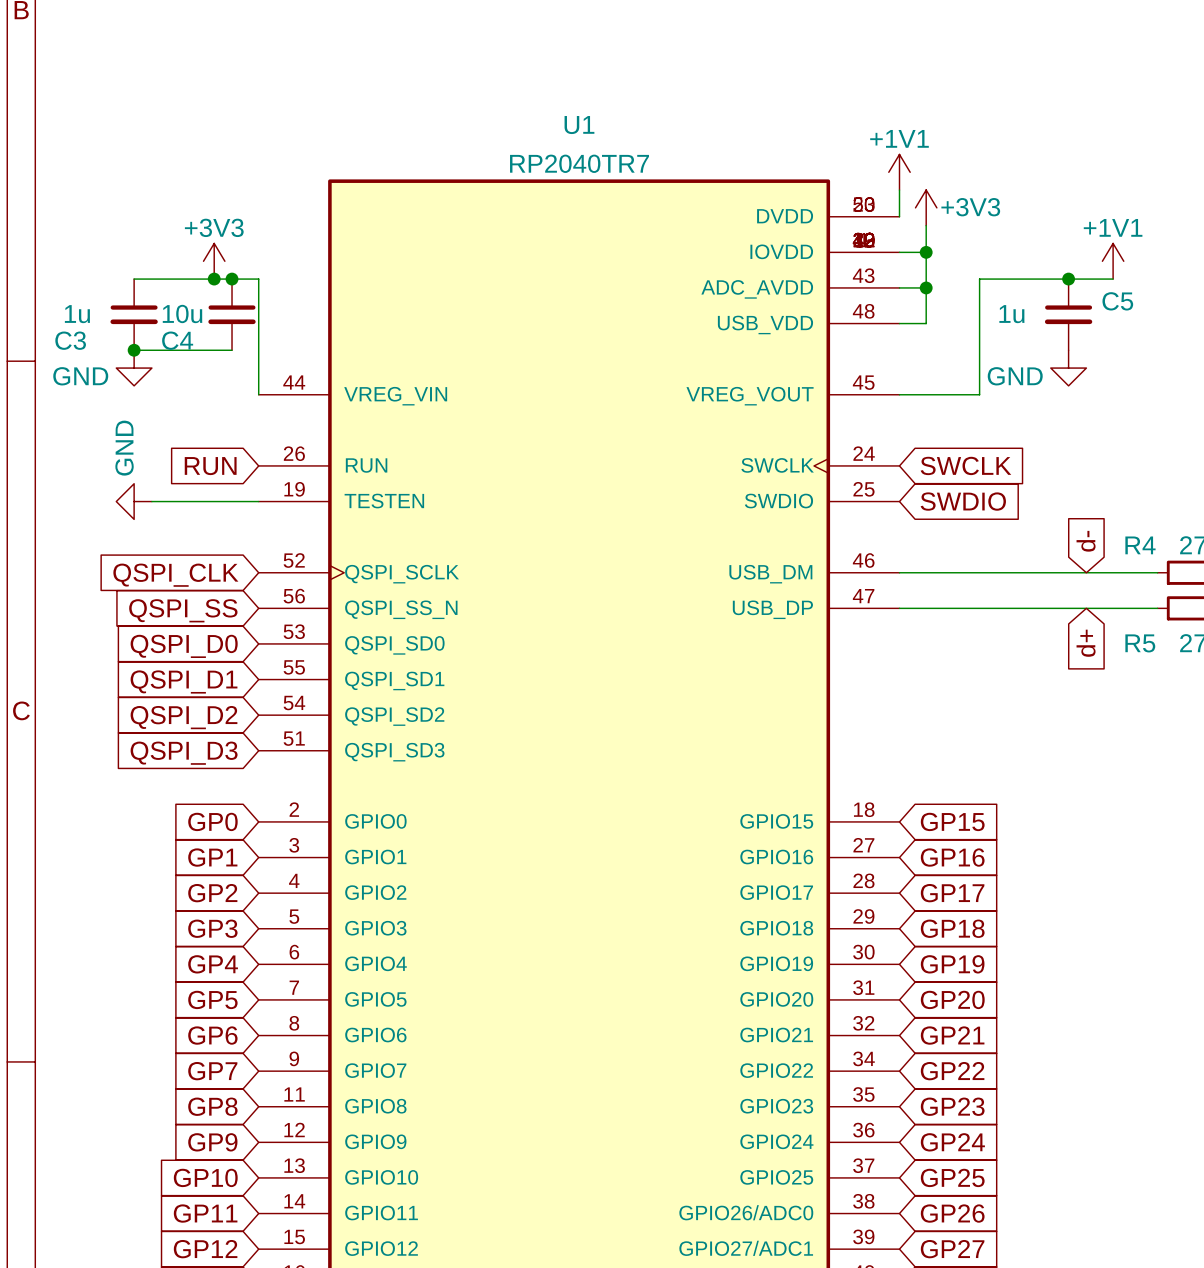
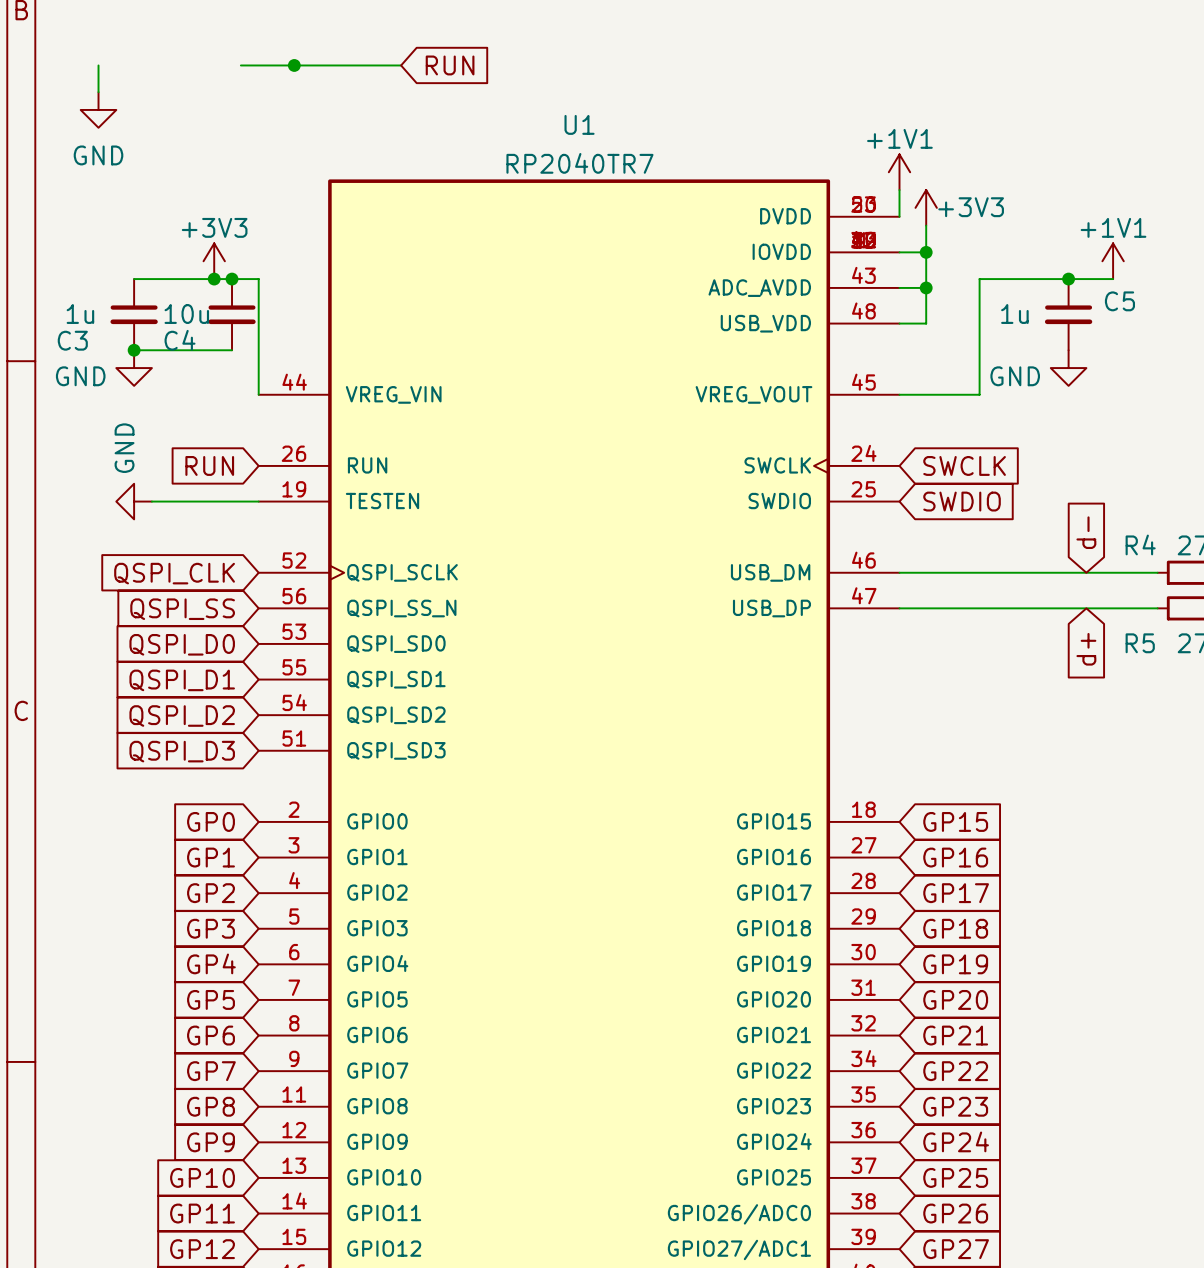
wire: none -> (98, 65) (98, 92)
wire: none -> (240, 65) (401, 65)
junction: none -> (294, 65)
global label: none -> RUN (450, 65)
power symbol: none -> GND (98, 109)

